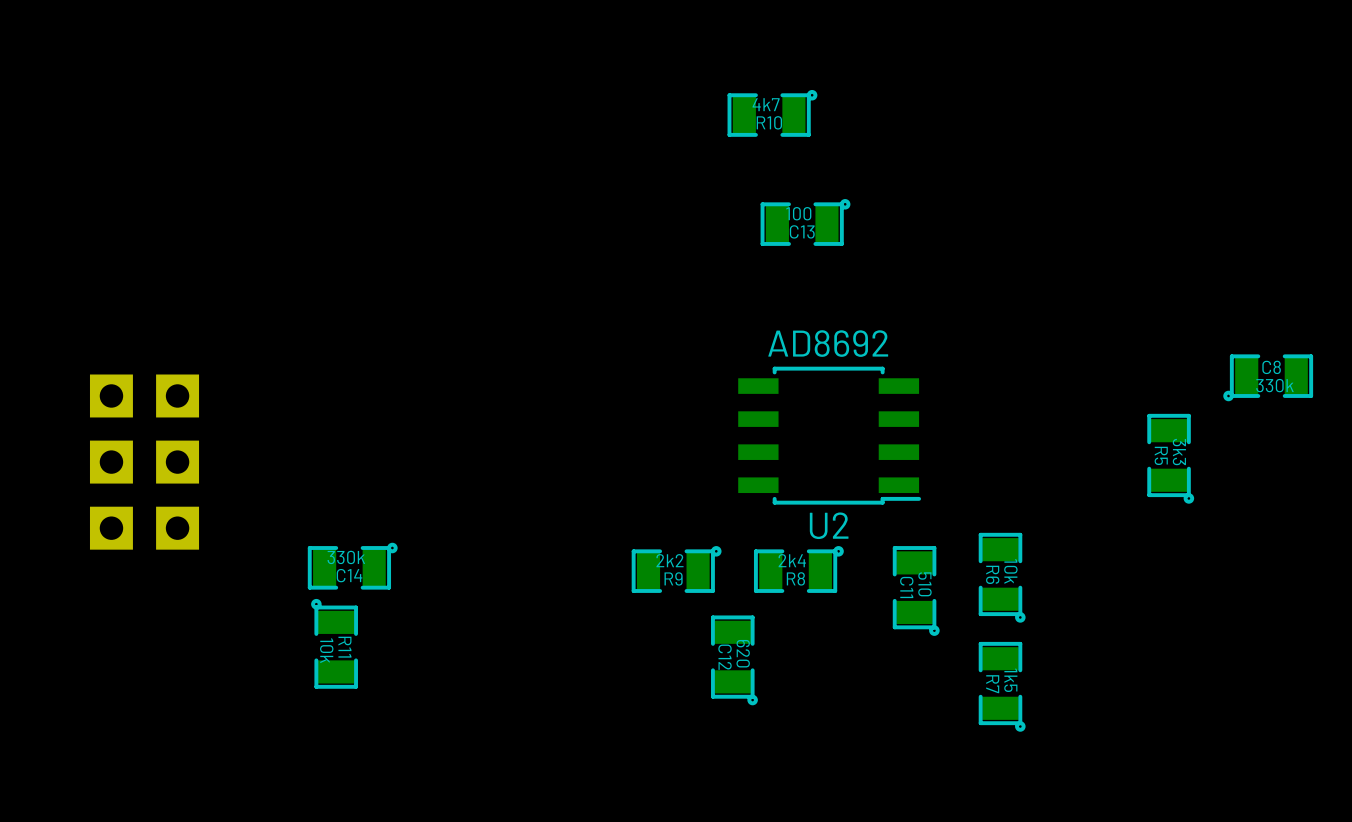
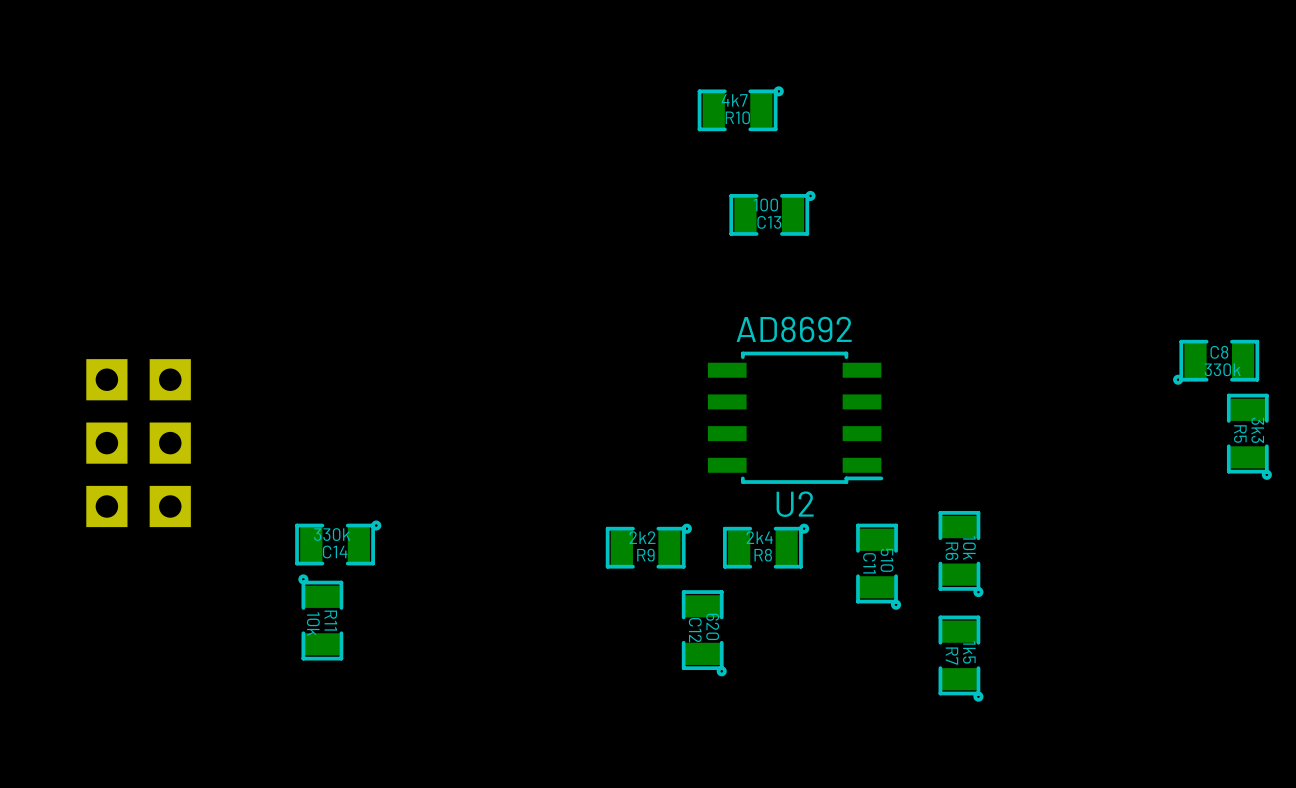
R5 position: (1170, 458) -> (1249, 436)

